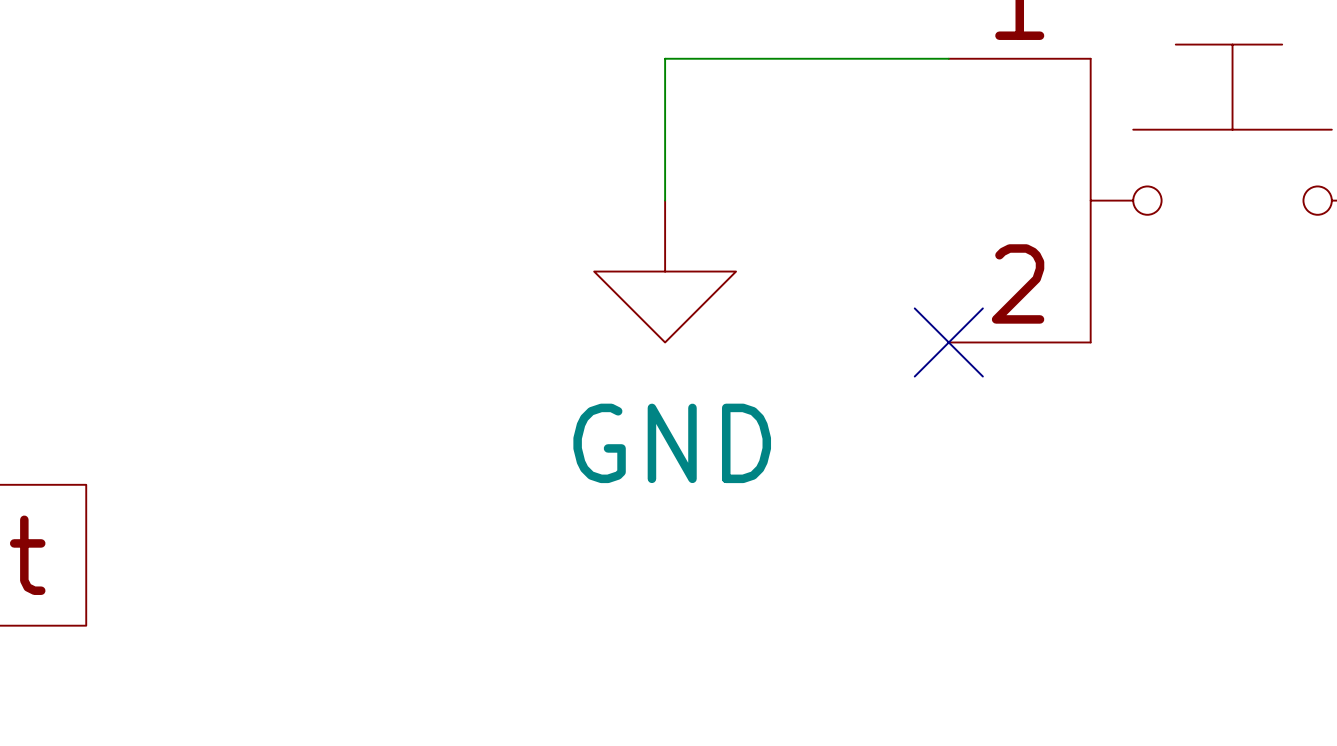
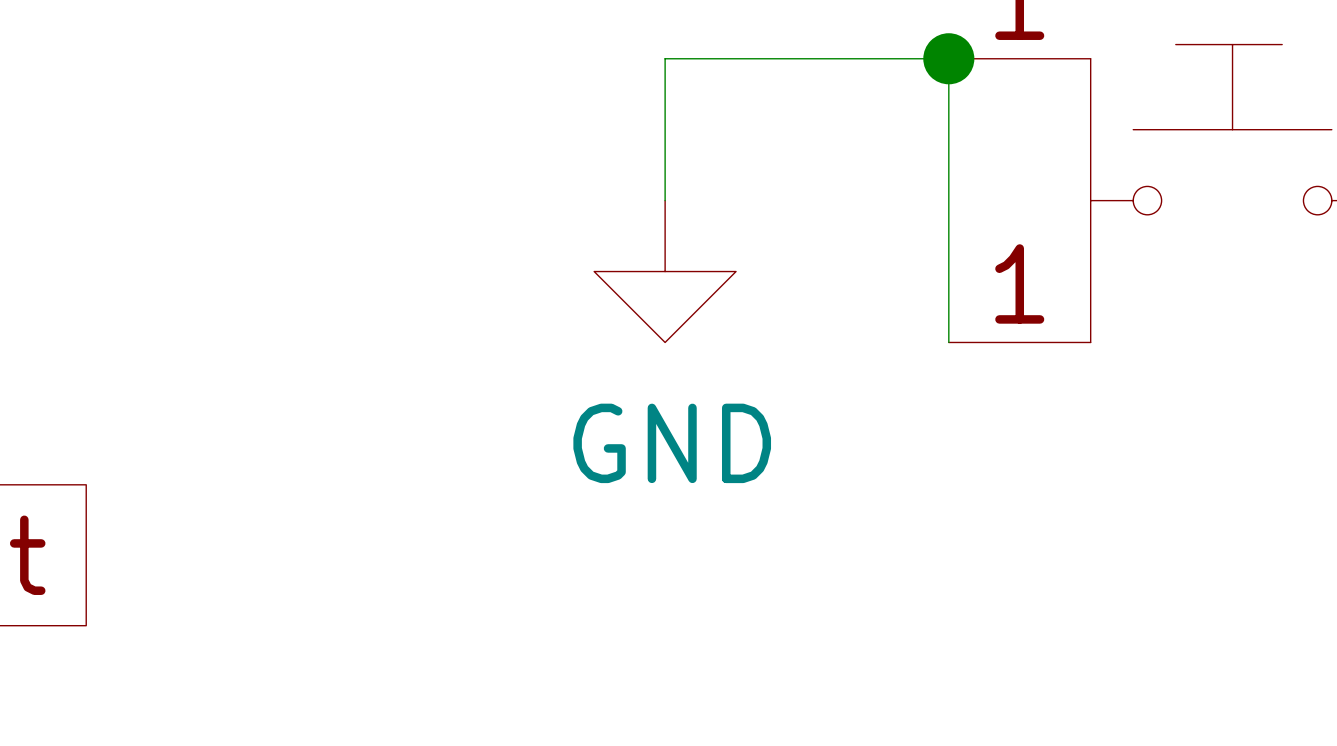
wire: none -> (948, 58) (948, 342)
junction: none -> (948, 58)
part pin number: 2 (1018, 283) -> 1 (1019, 283)
no-connect mark: (948, 342) -> none

